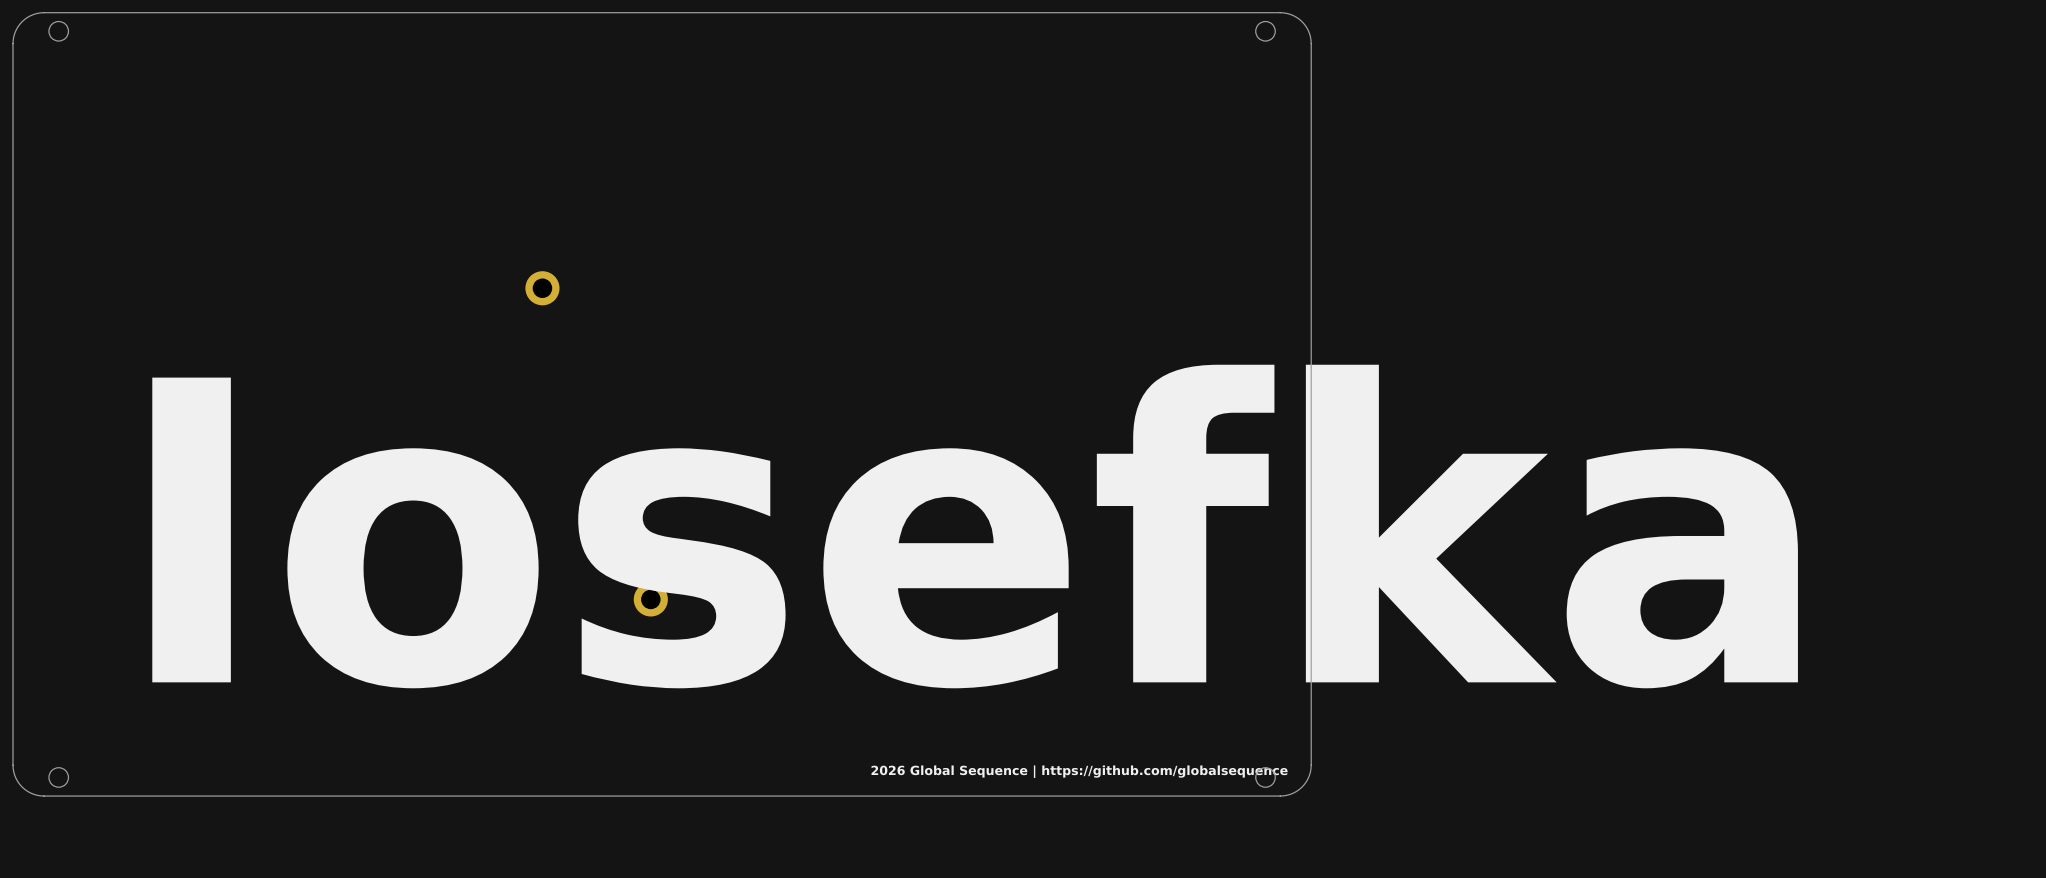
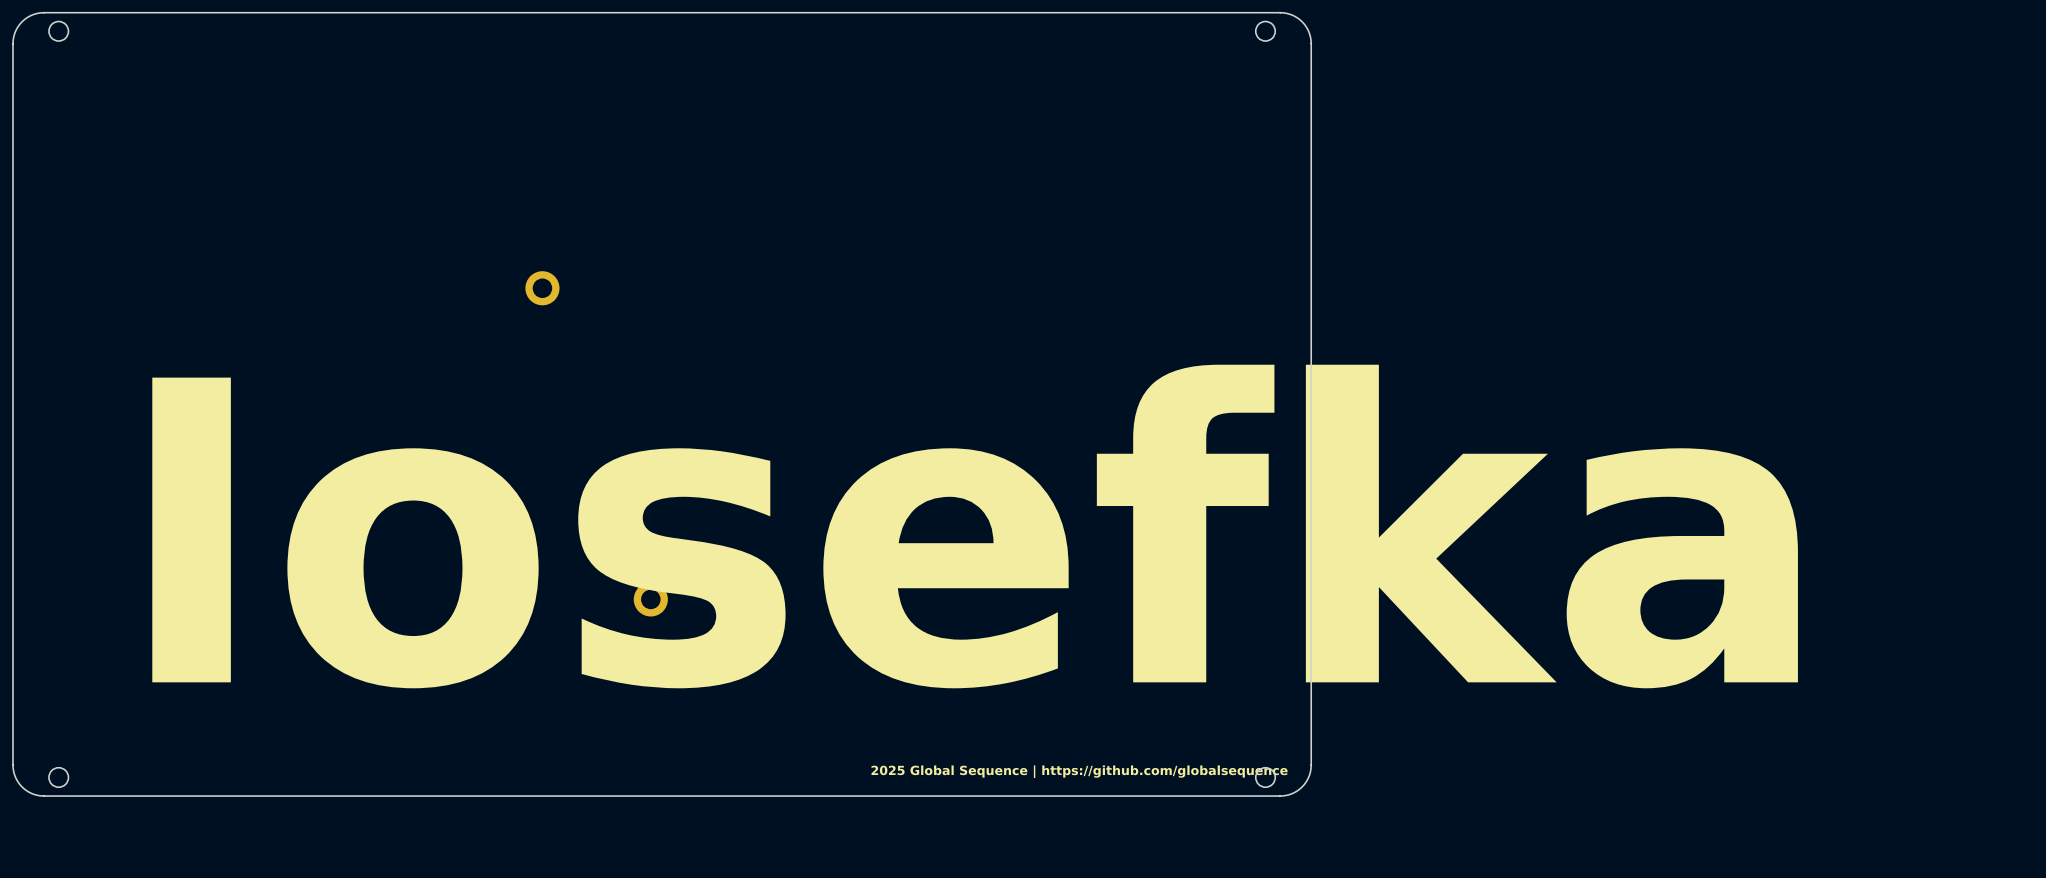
text: 2026 Global Sequence | https://github.com/globalsequence (1079, 771) -> 2025 Global Sequence | https://github.com/globalsequence (1079, 771)

